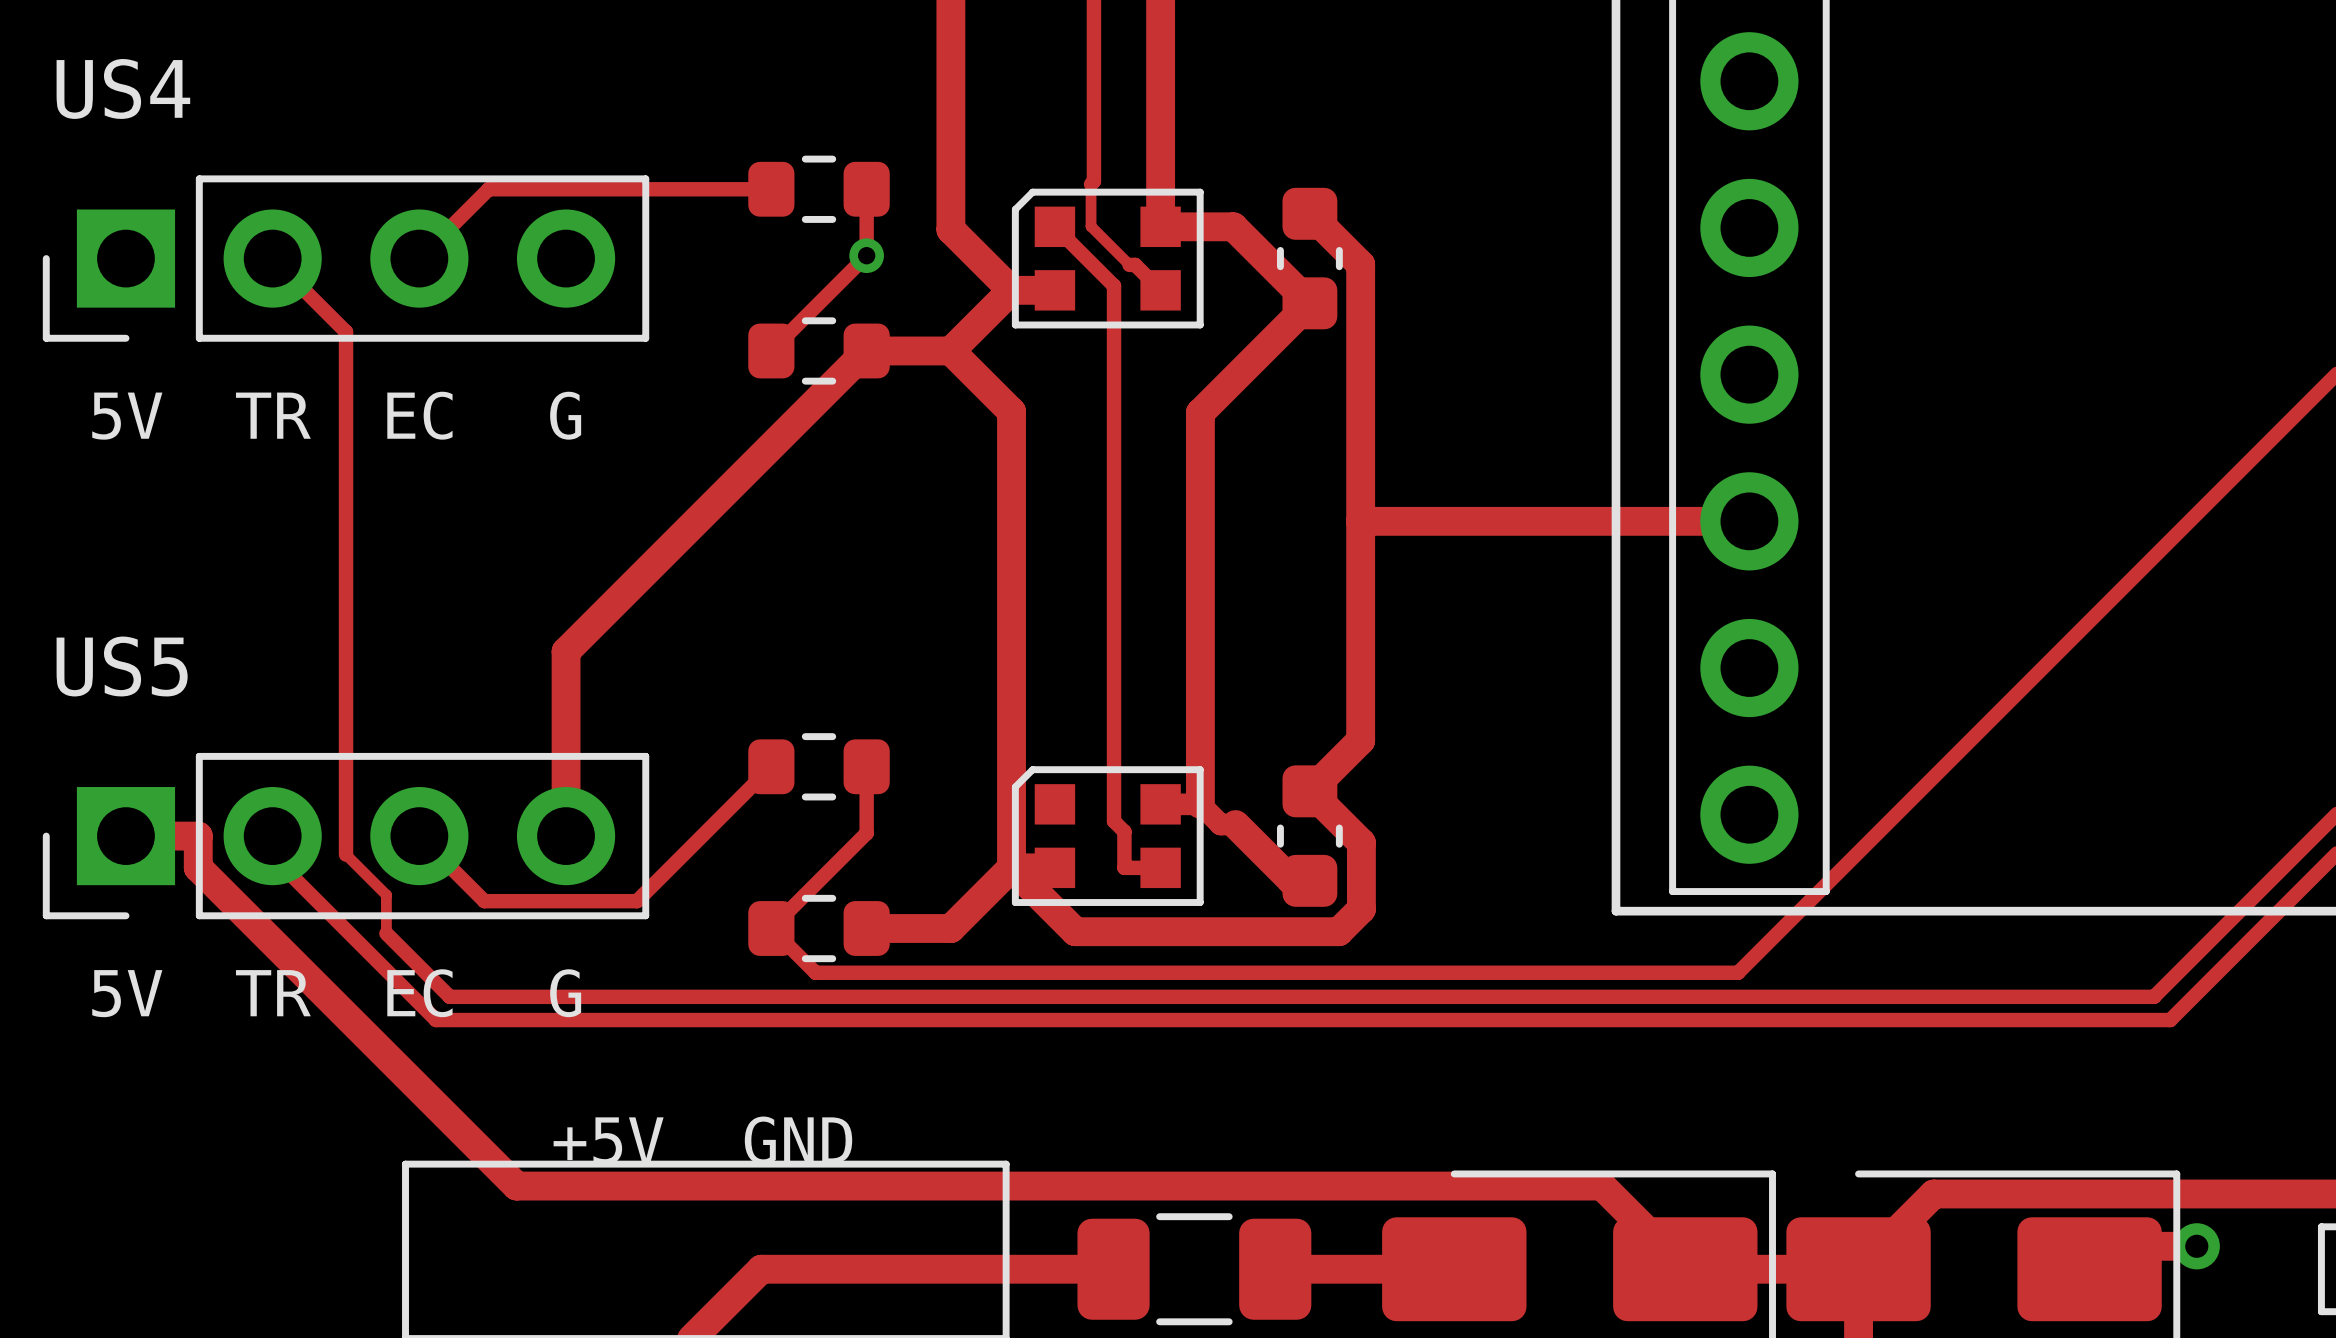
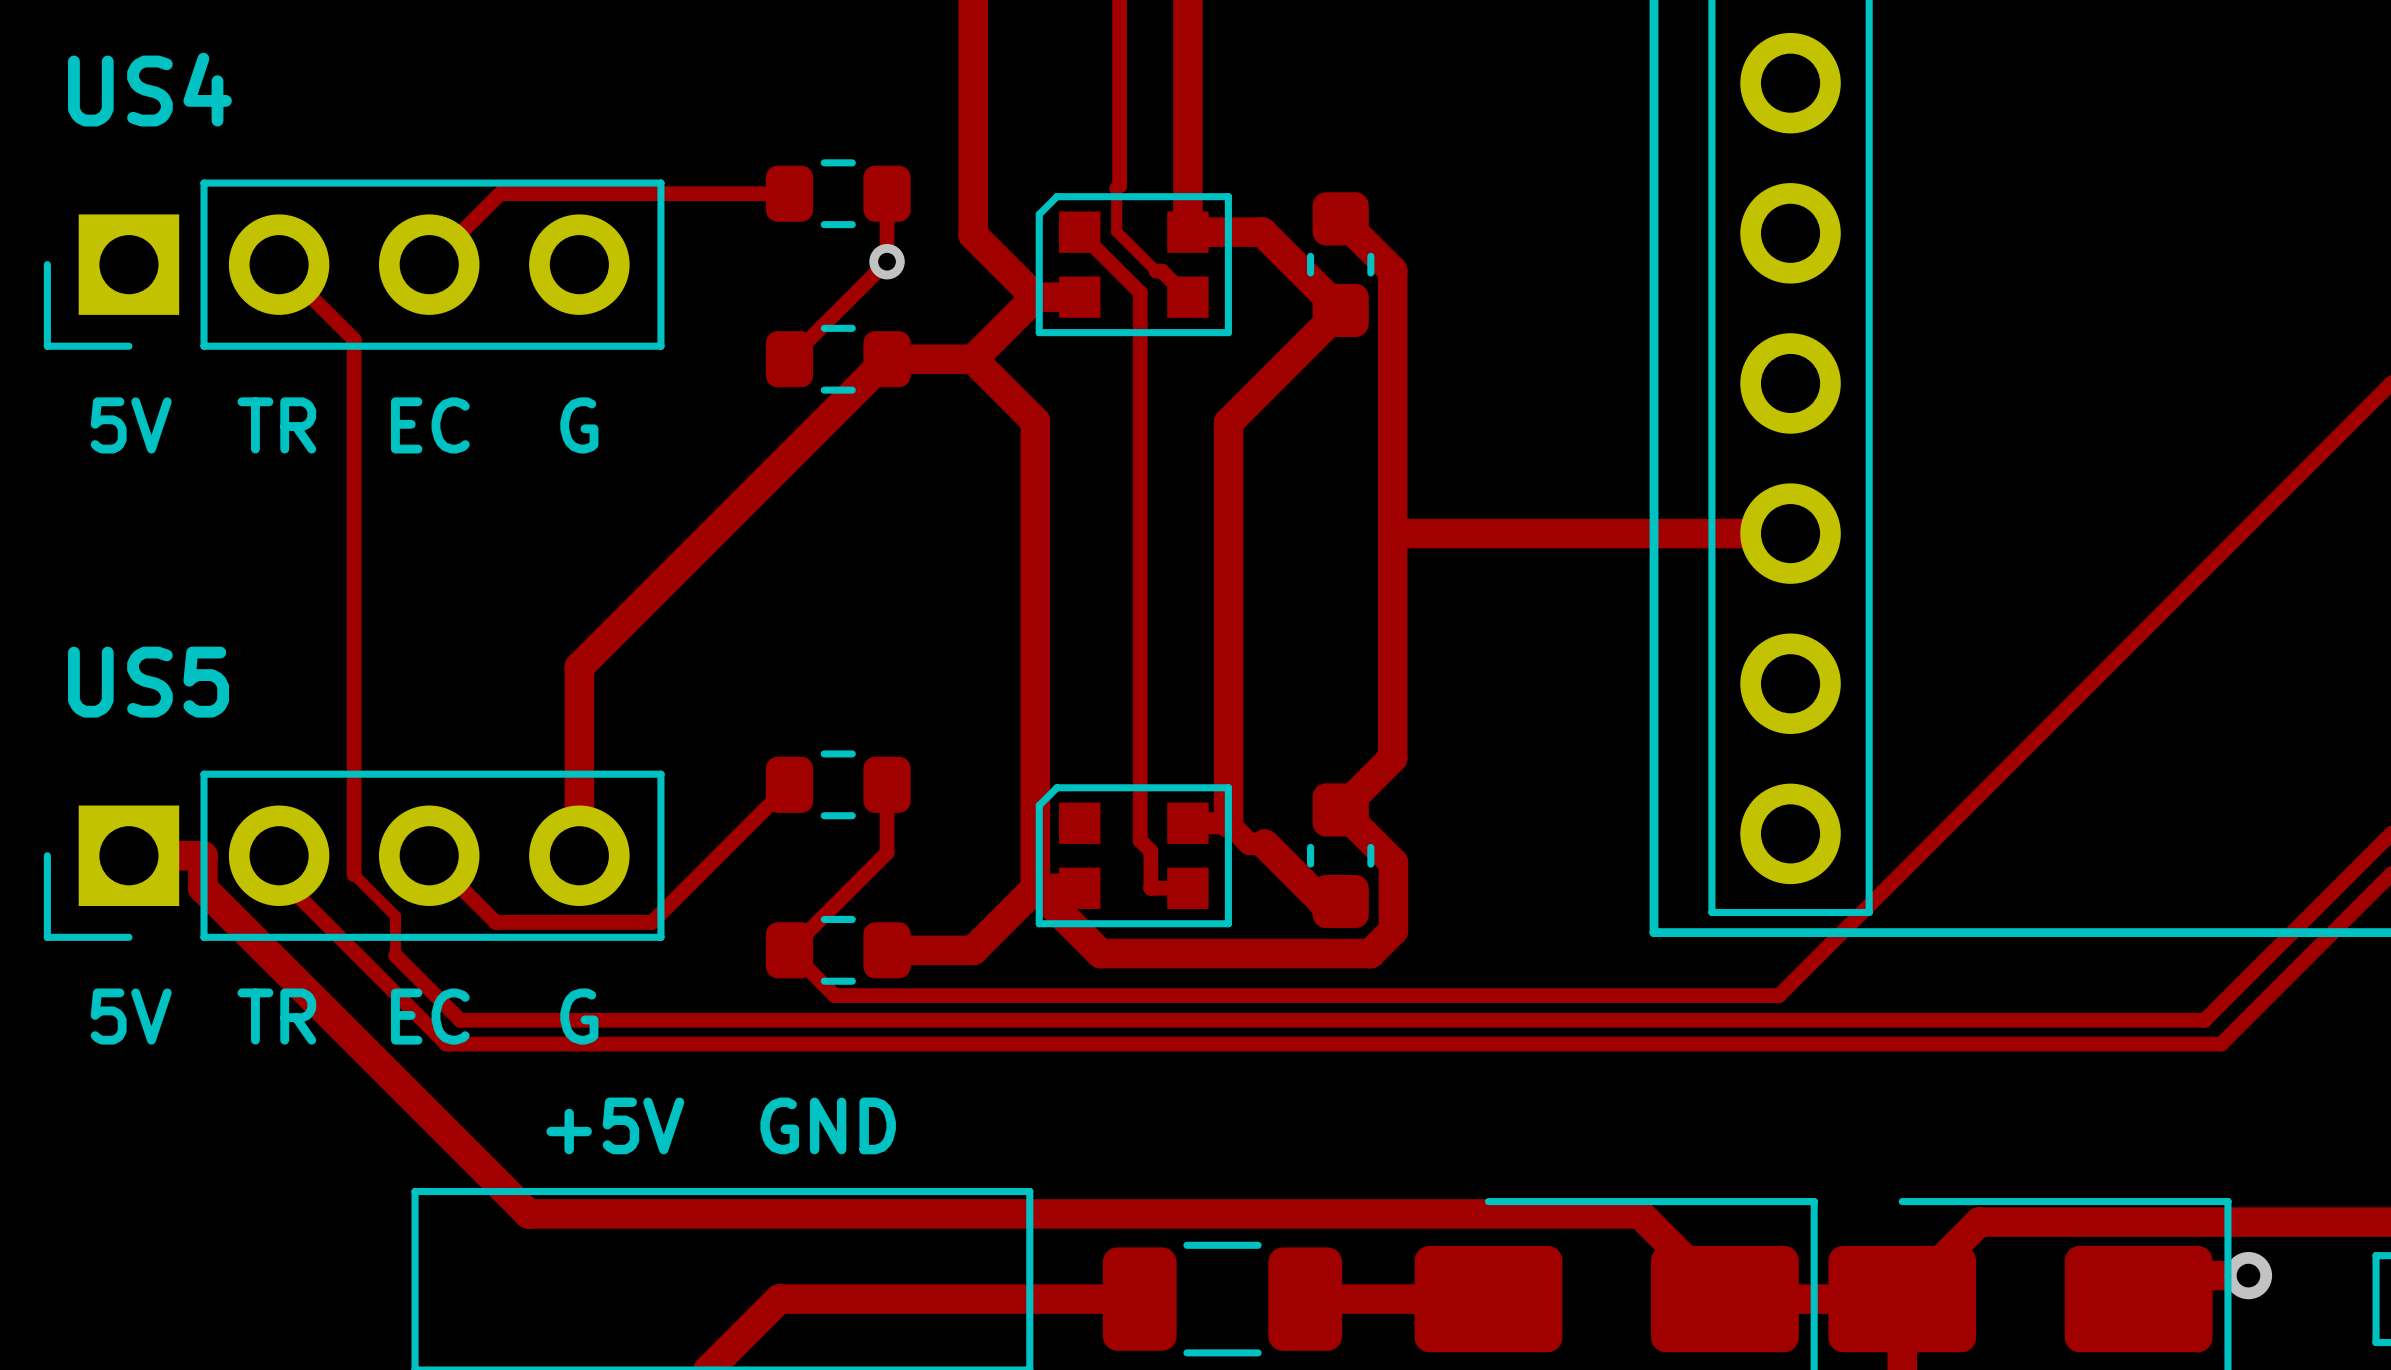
text position: +5V GND (702, 1140) -> +5V GND (721, 1125)

